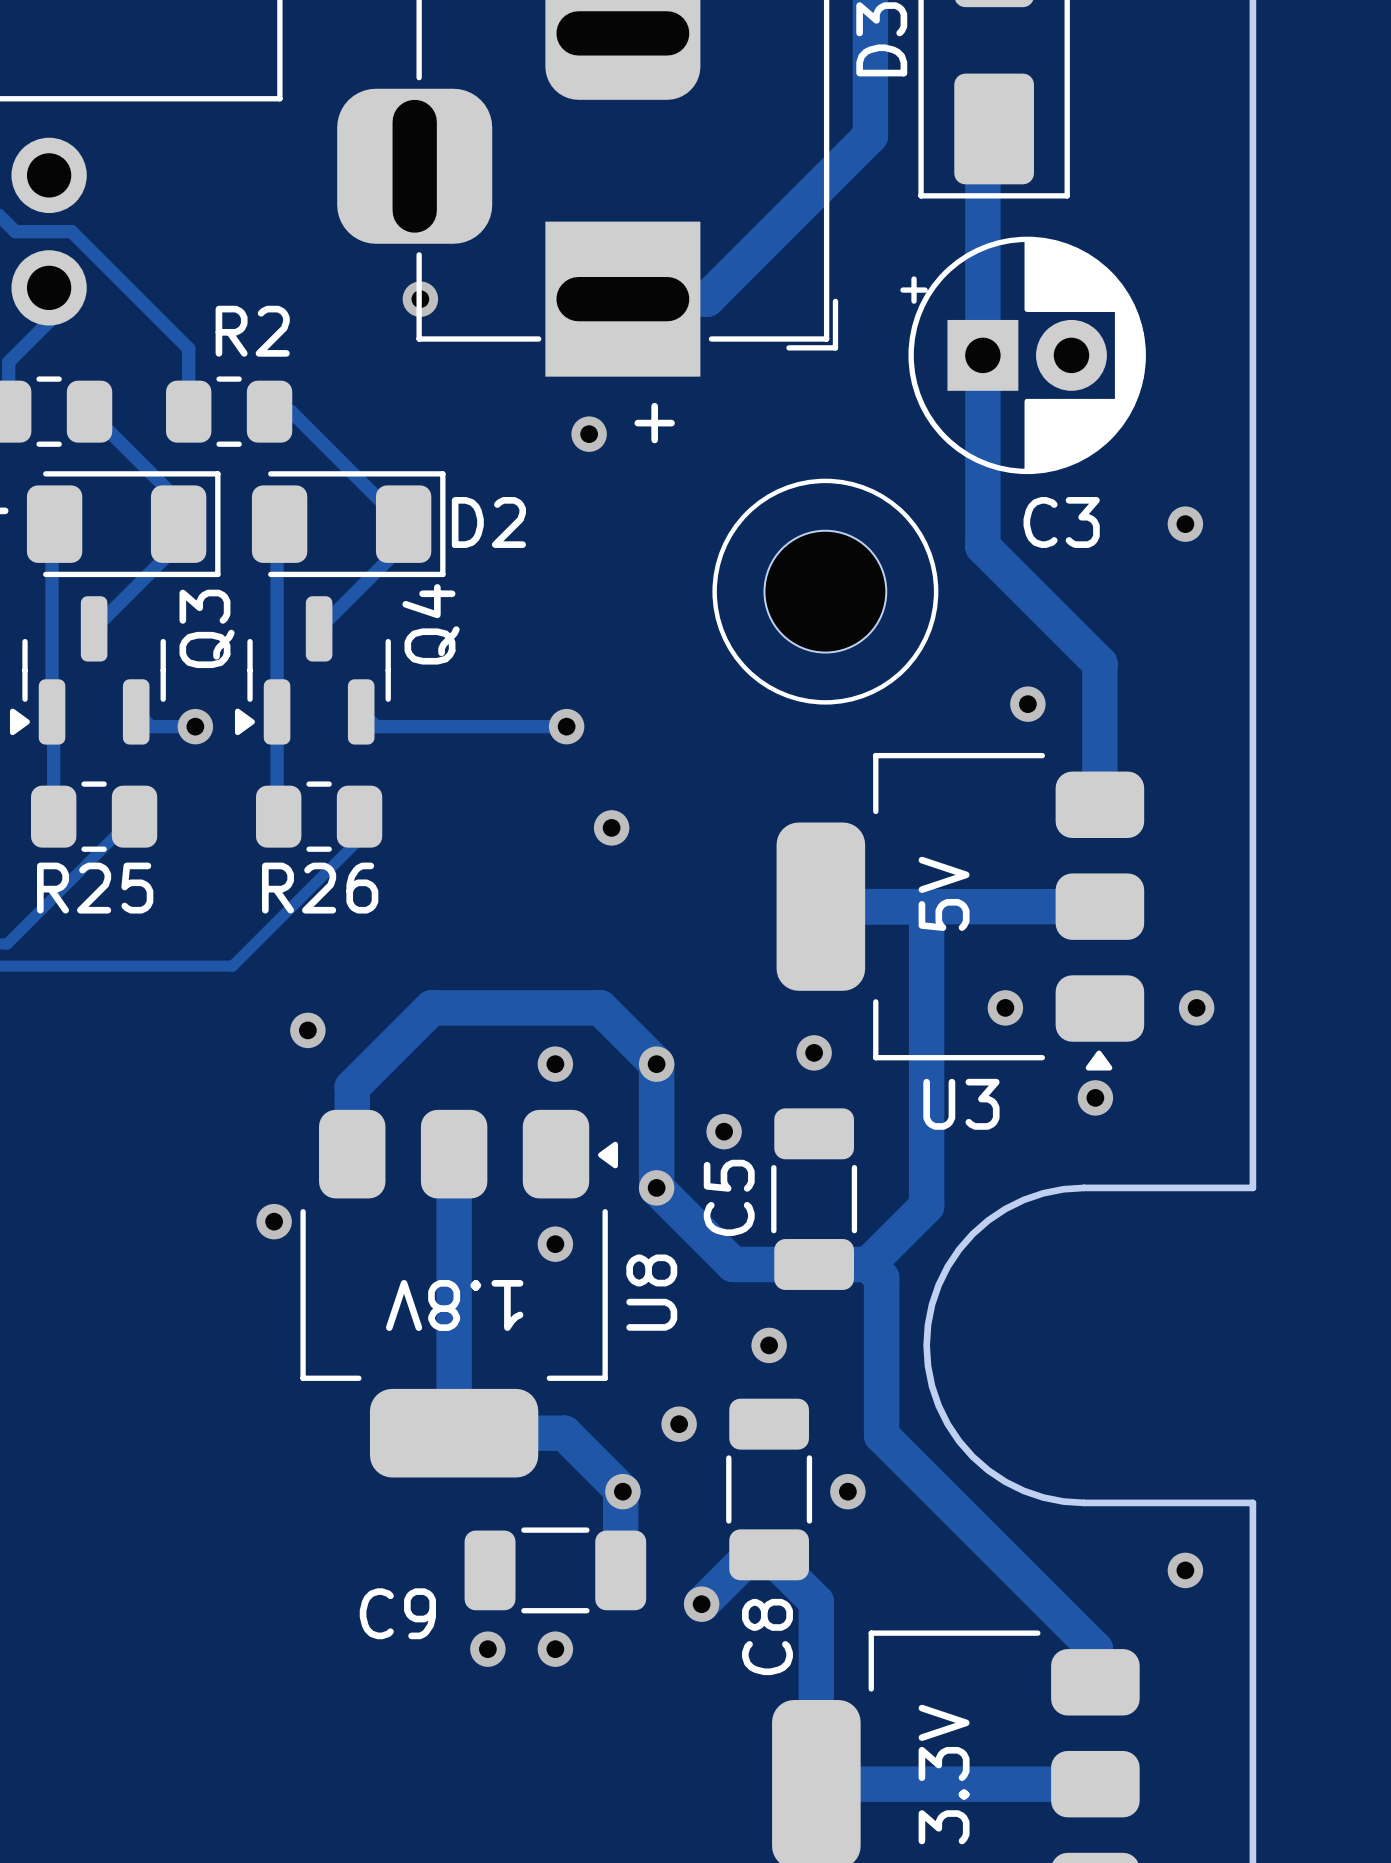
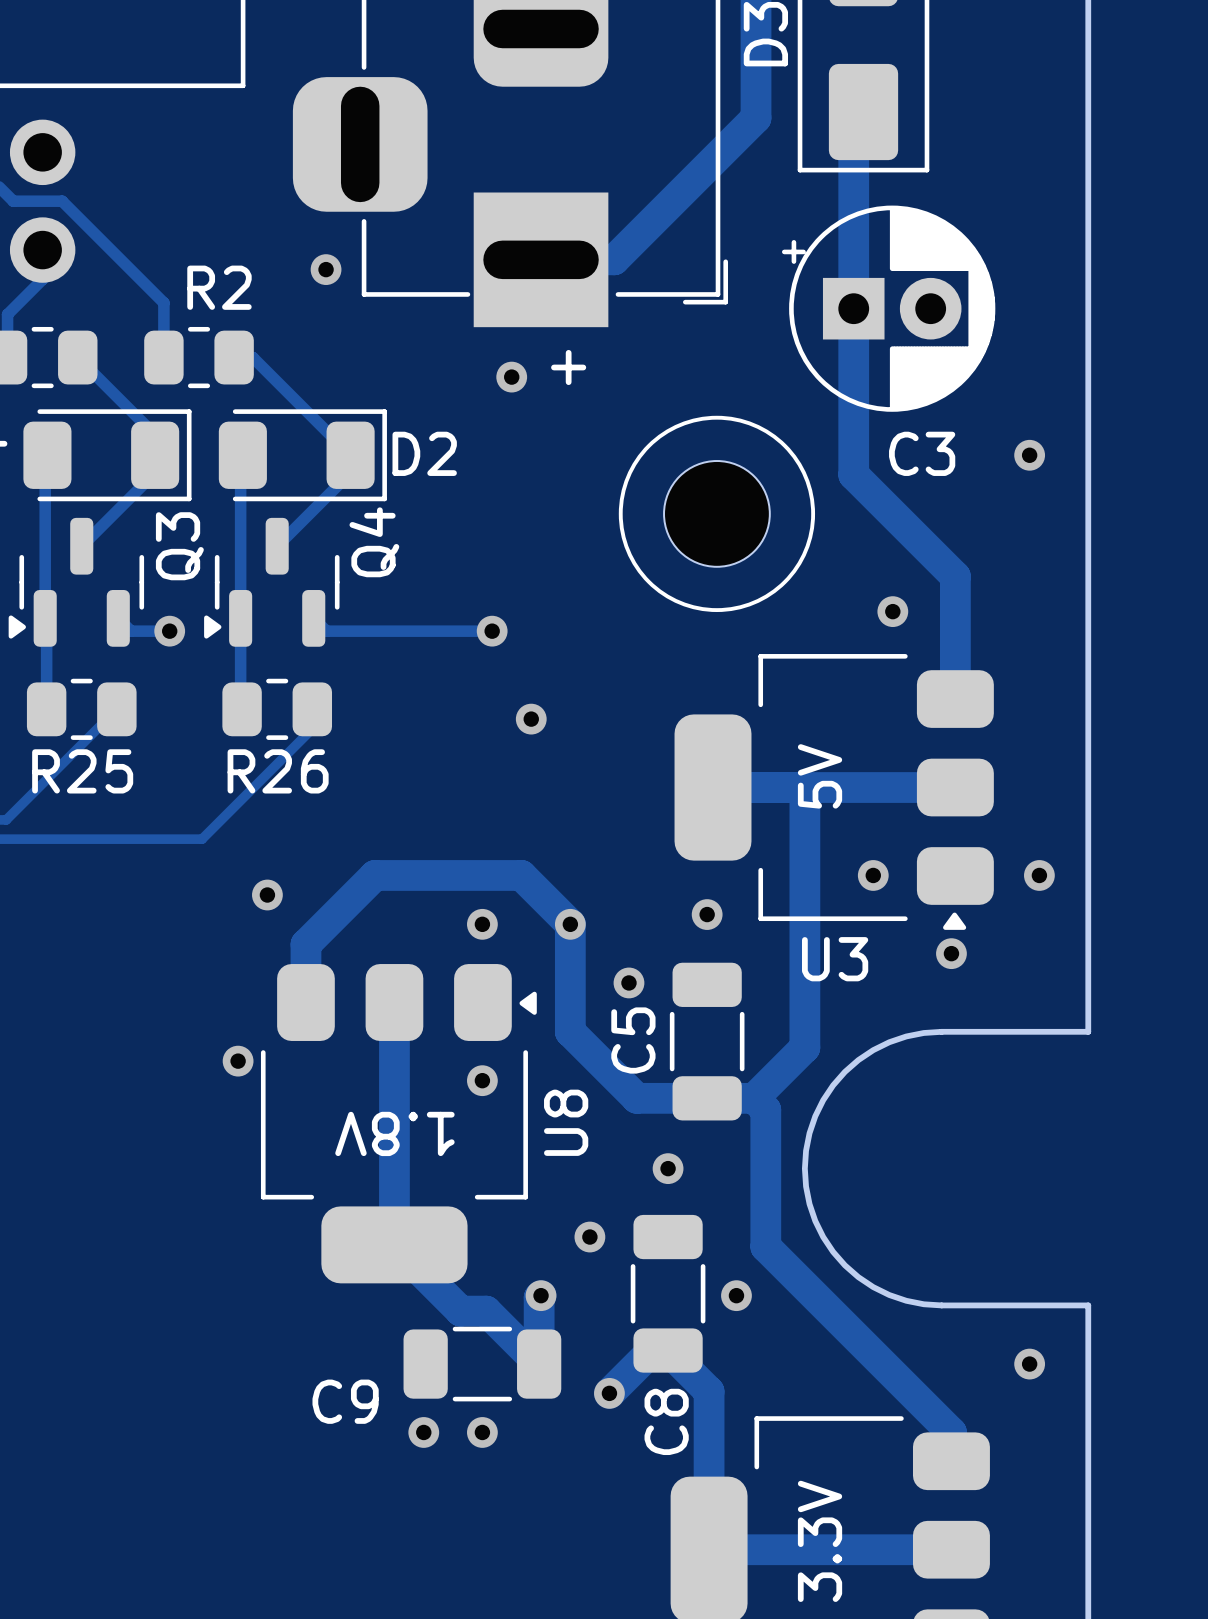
via position: (420, 299) -> (326, 269)
via: (656, 1187) -> none
track: (454, 1433) (564, 1433) (622, 1491) -> (394, 1244) (460, 1311) (486, 1311) (539, 1364)

